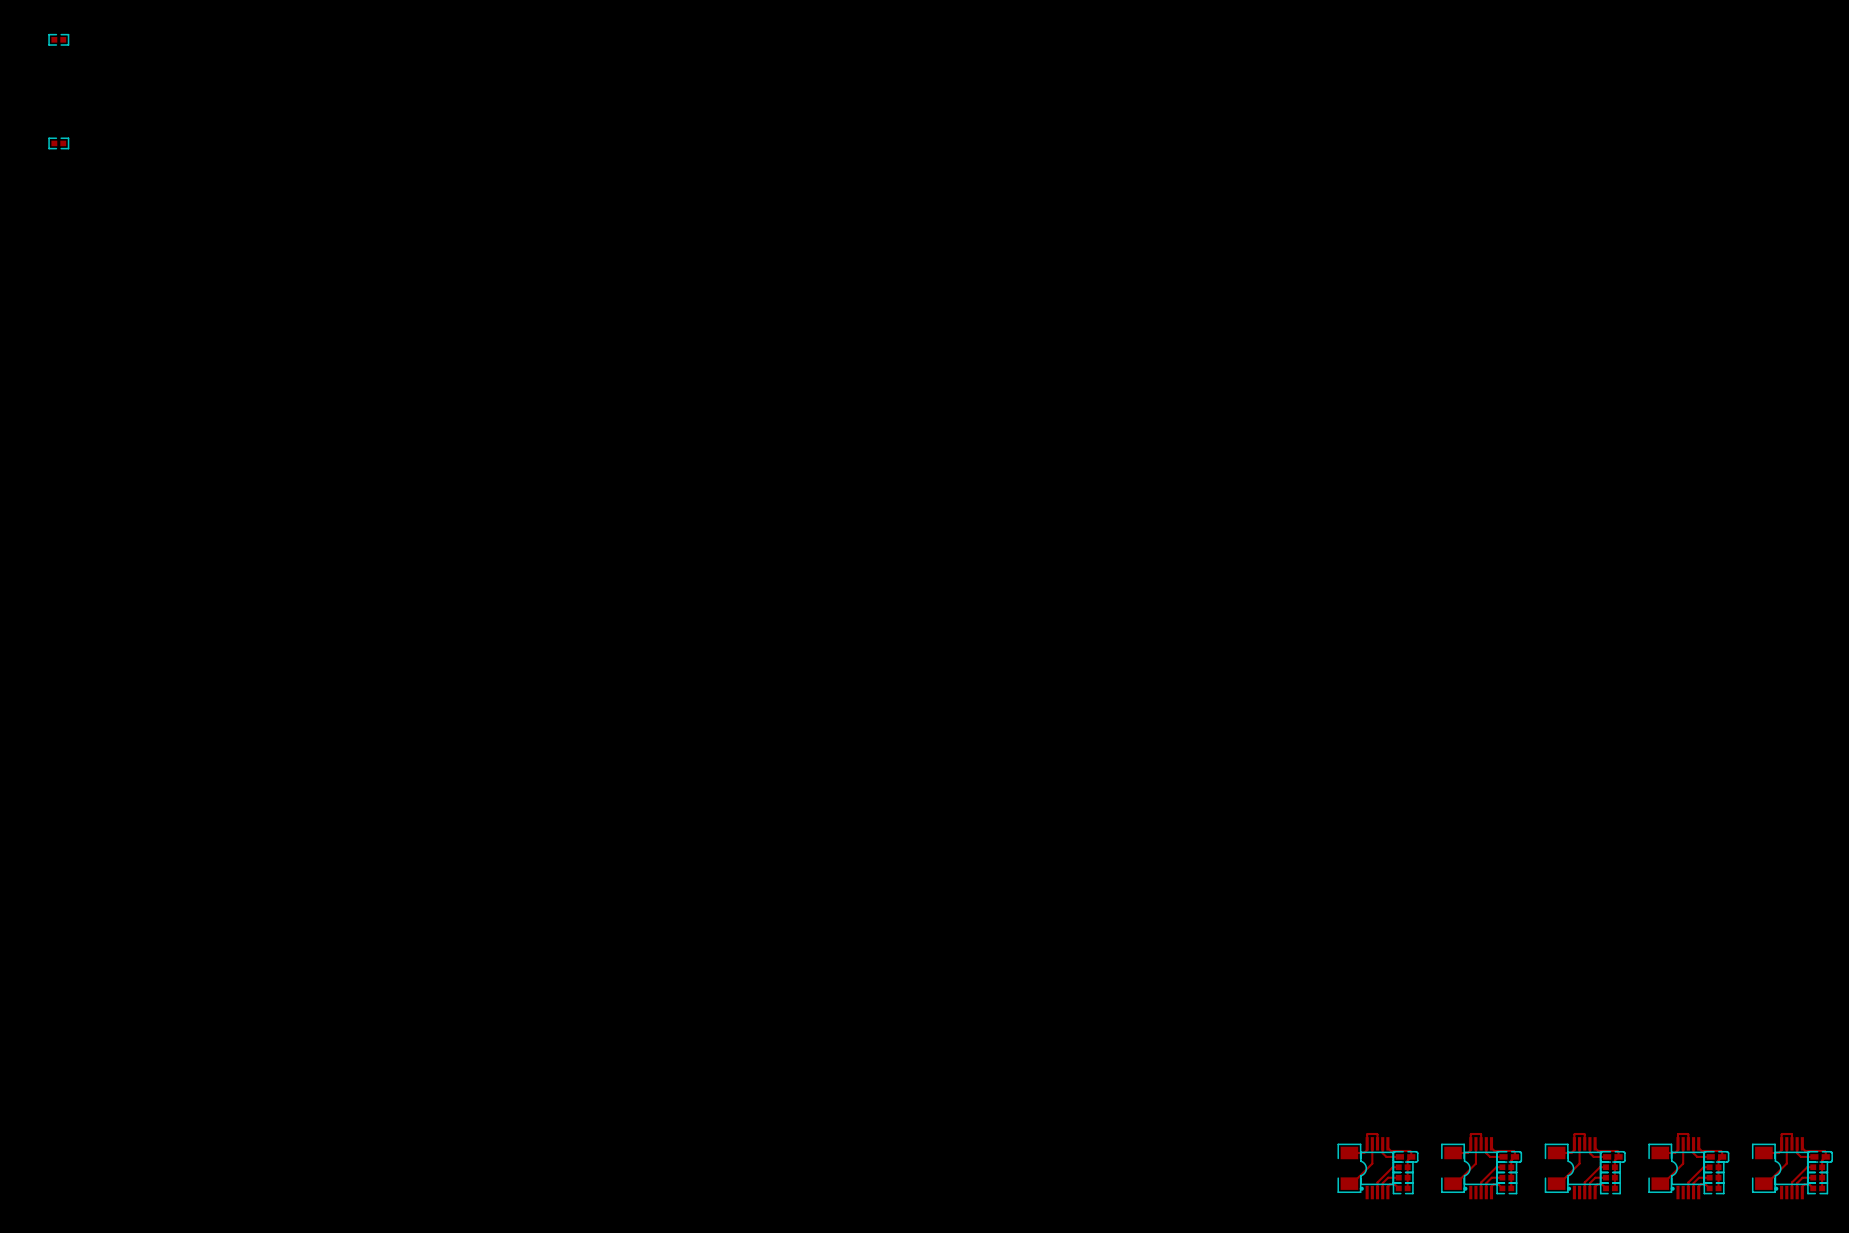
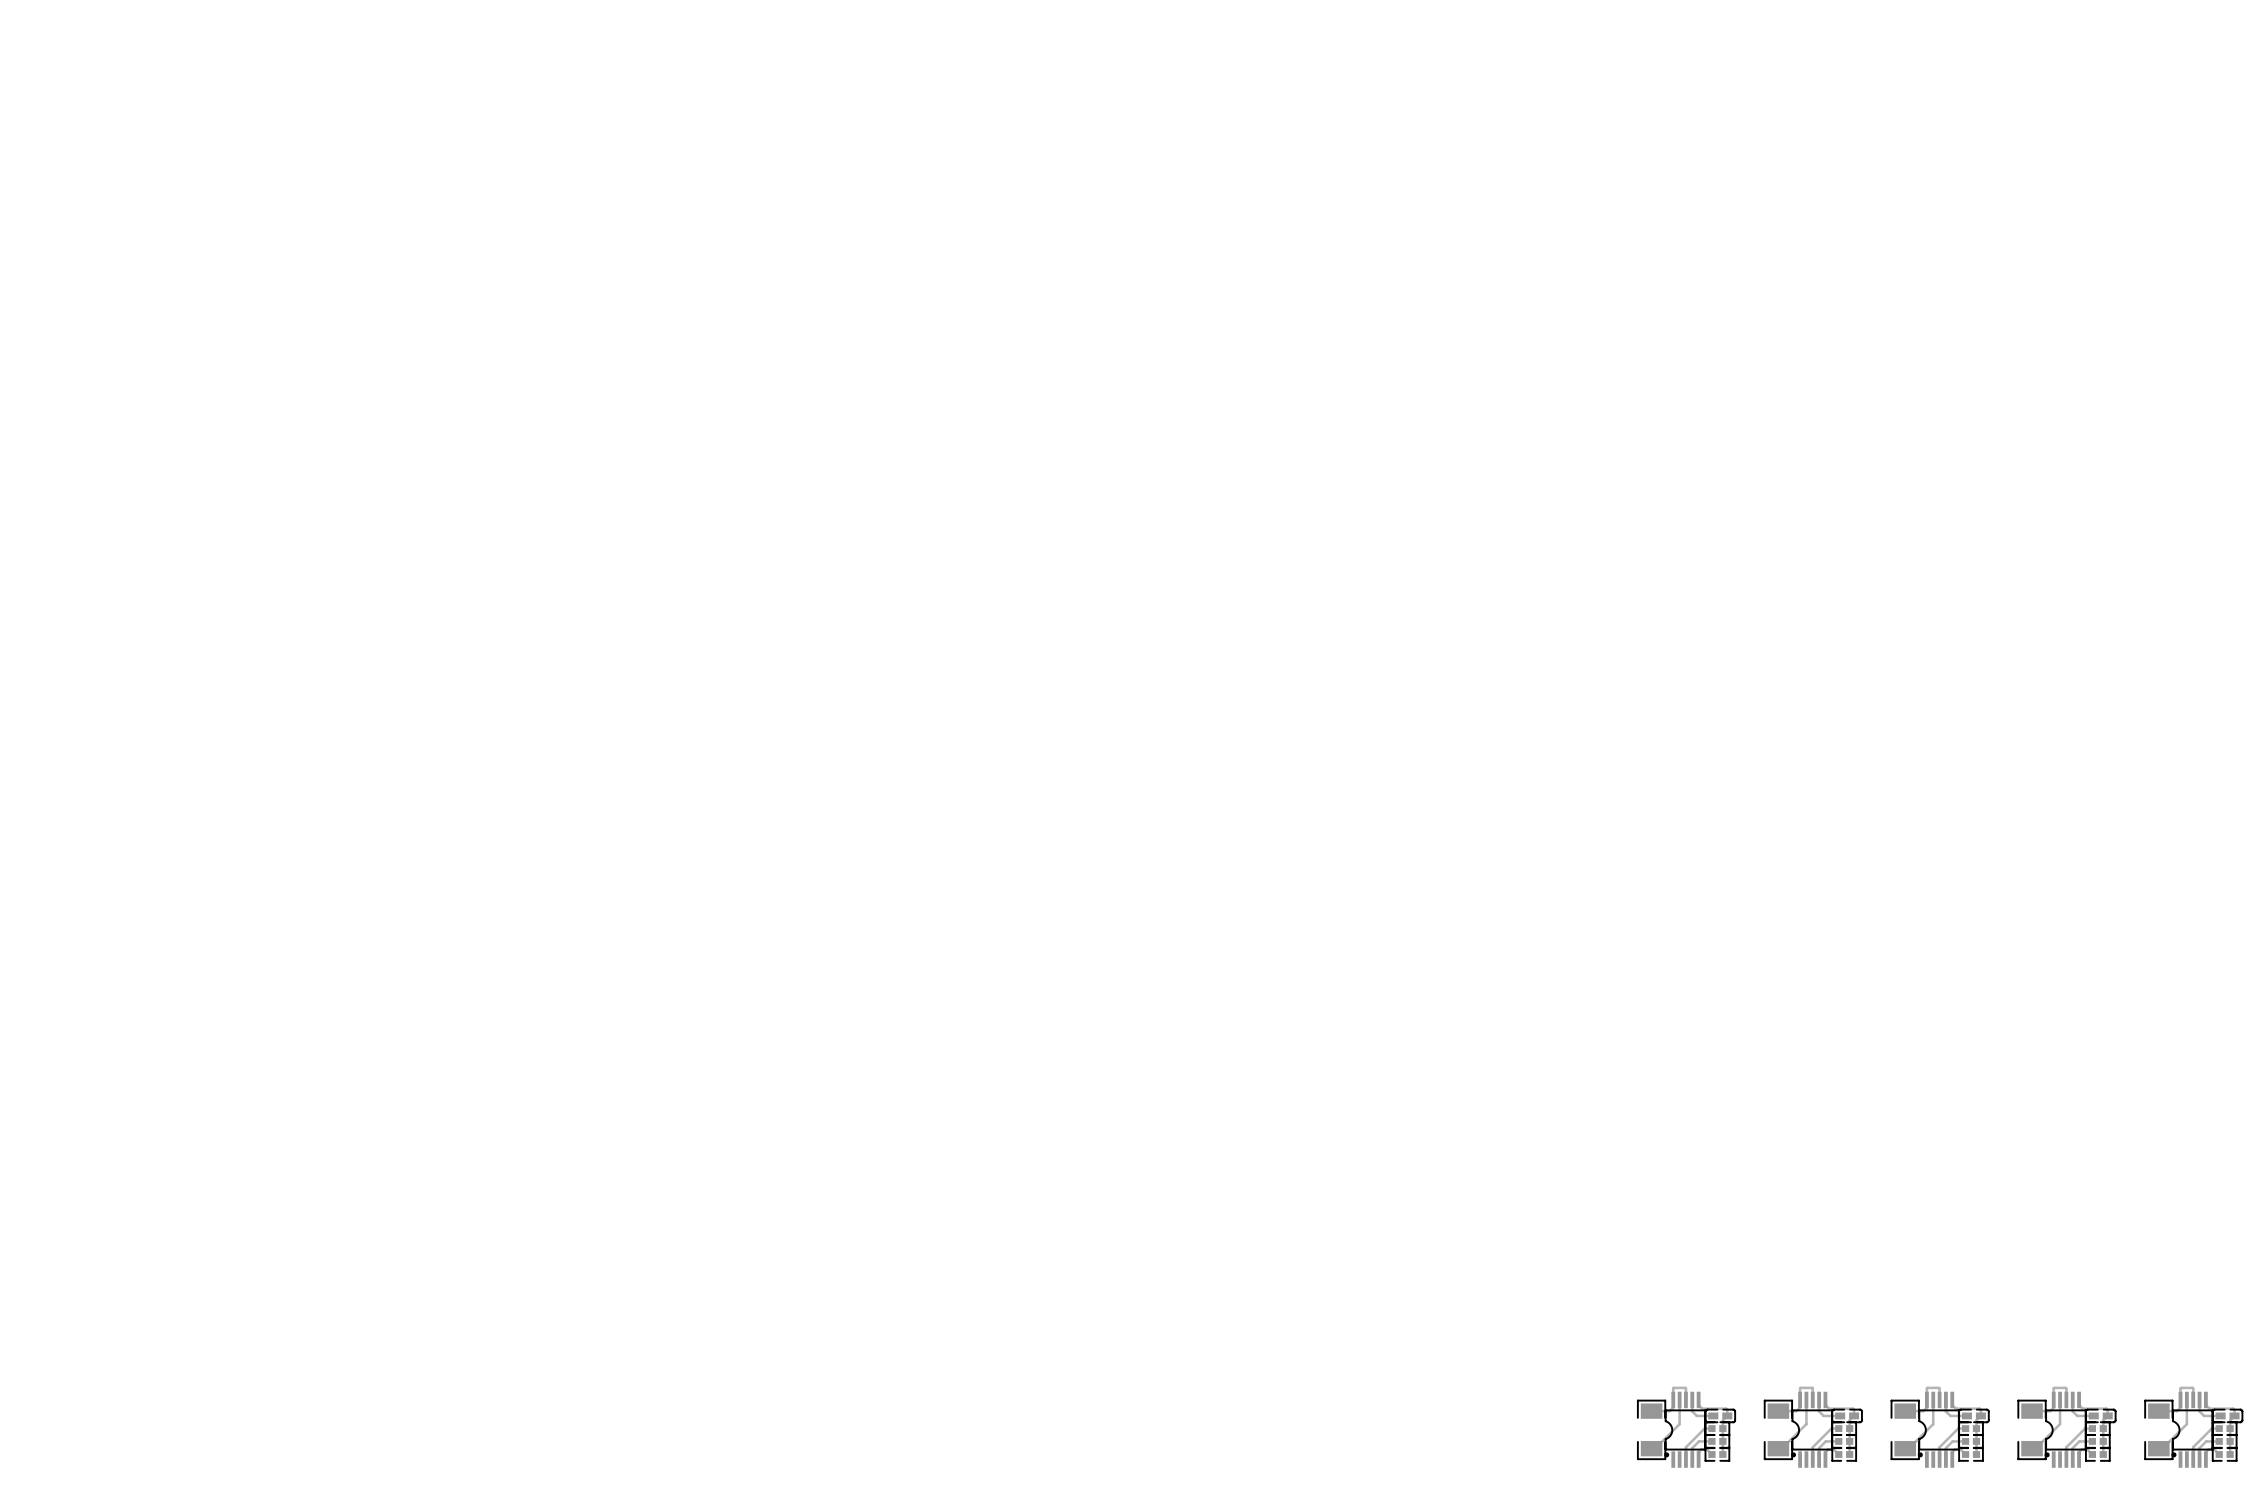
part: (58, 39) -> none
part: (58, 143) -> none

